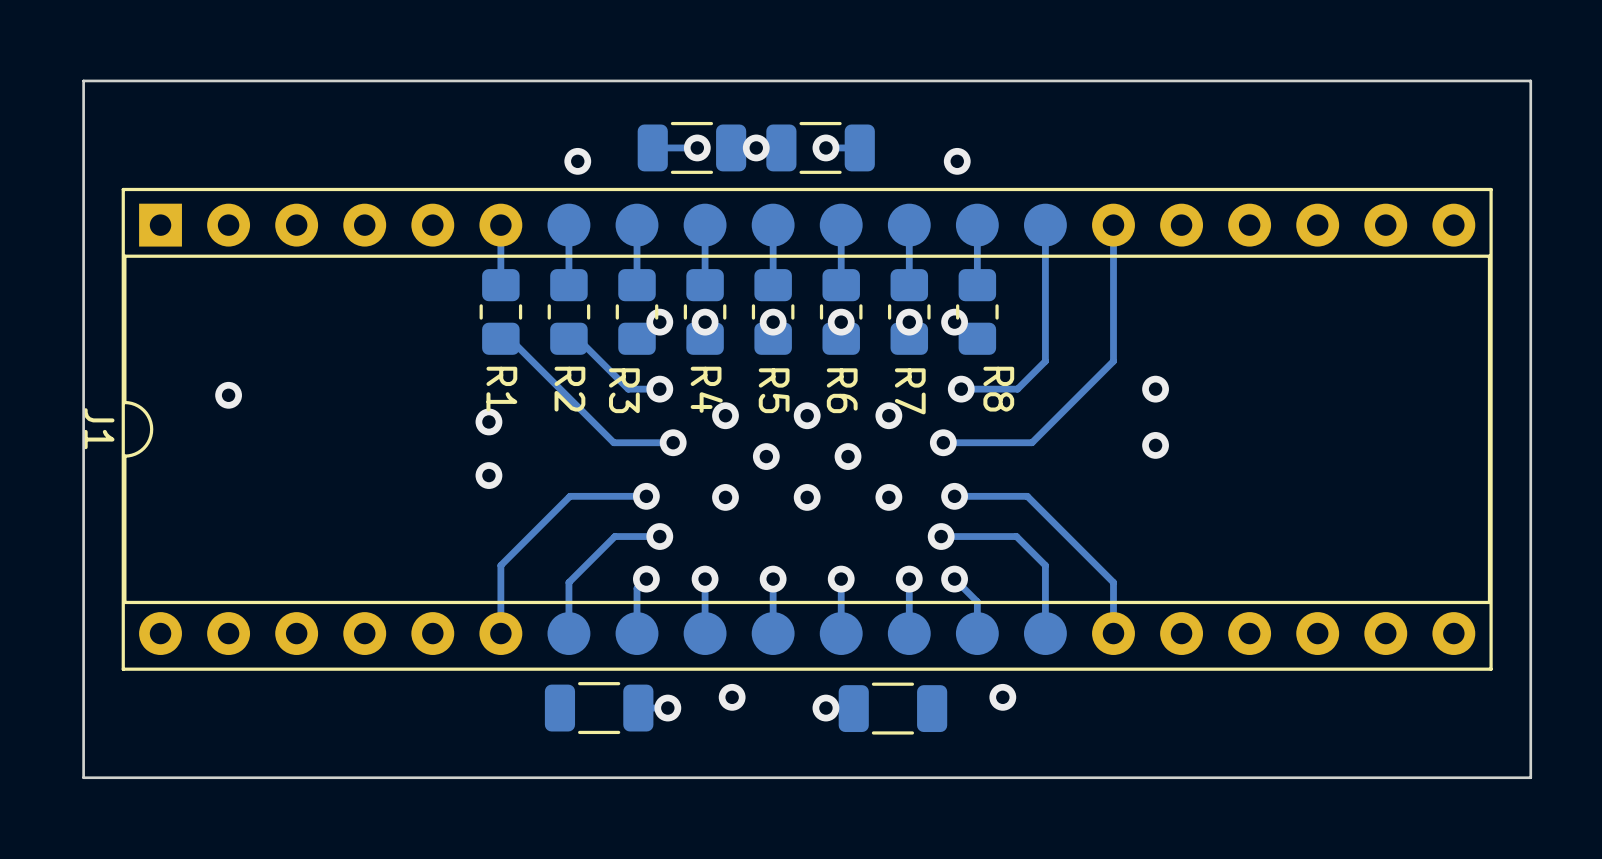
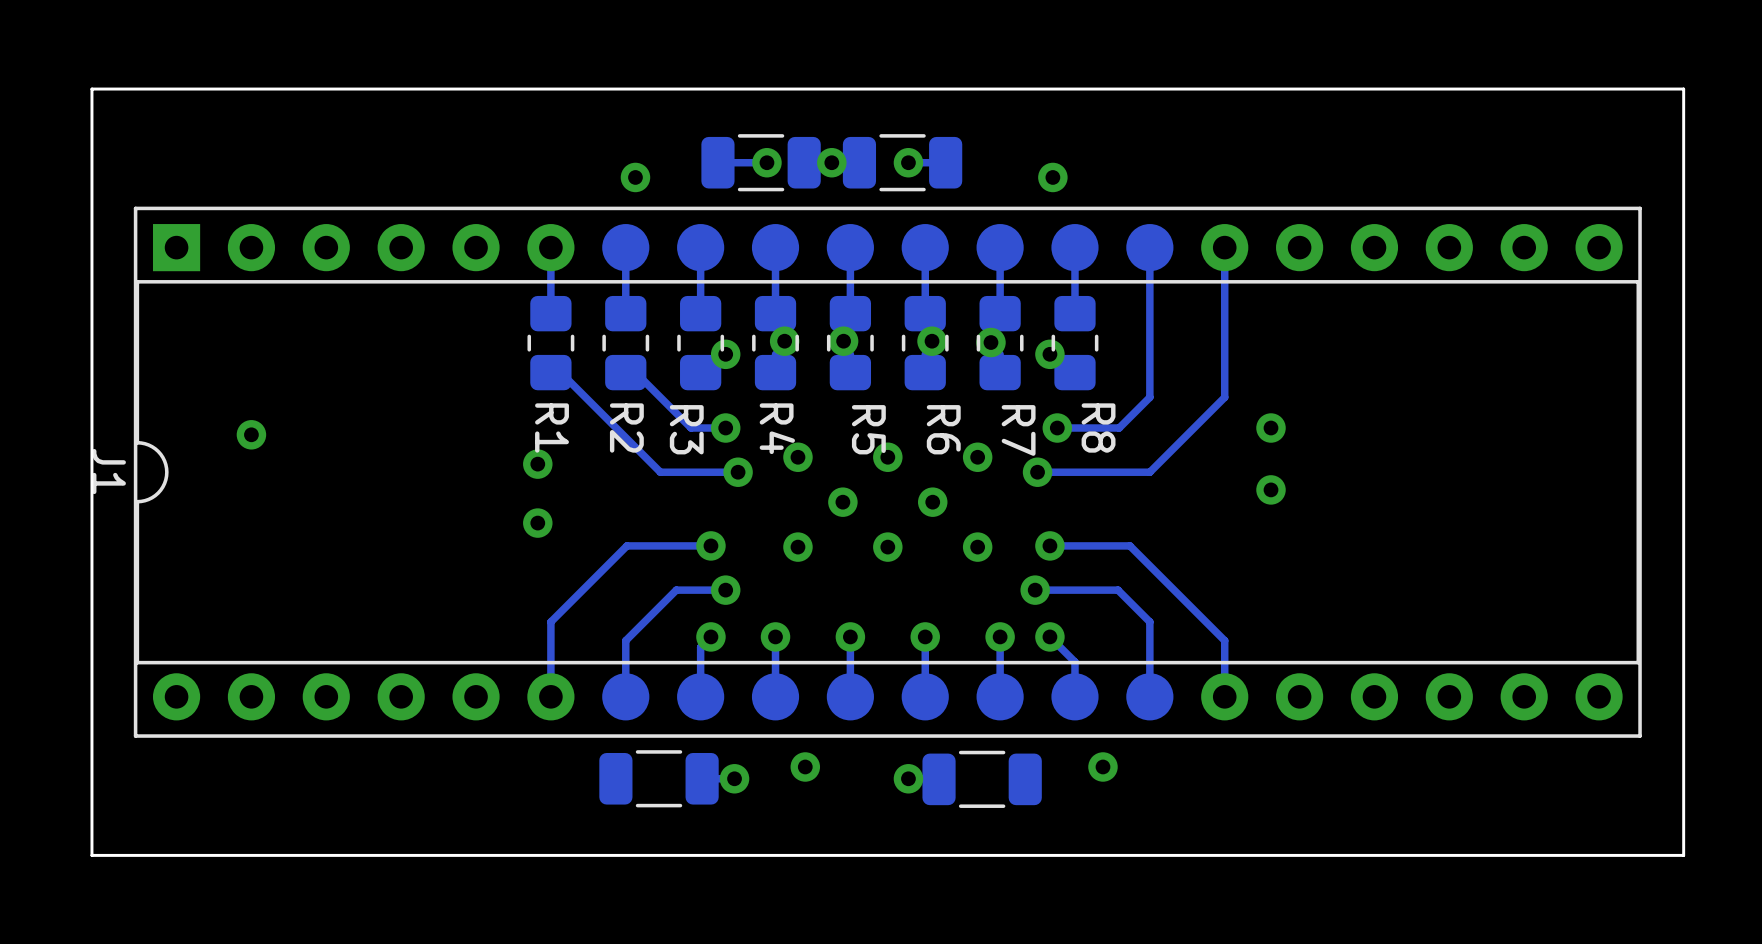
via position: (705, 322) -> (784, 341)
via position: (773, 322) -> (843, 341)
via position: (841, 322) -> (932, 341)
via position: (909, 322) -> (990, 342)
R5 name position: R5 (774, 390) -> R5 (868, 429)
R6 name position: R6 (842, 390) -> R6 (943, 429)
R7 name position: R7 (910, 391) -> R7 (1018, 430)
track: (600, 429) (613, 442) (673, 442) -> (660, 472) (738, 472)
track: (1045, 429) (1032, 442) (943, 442) -> (1149, 472) (1037, 472)
via position: (673, 442) -> (738, 472)
via position: (943, 442) -> (1037, 472)

